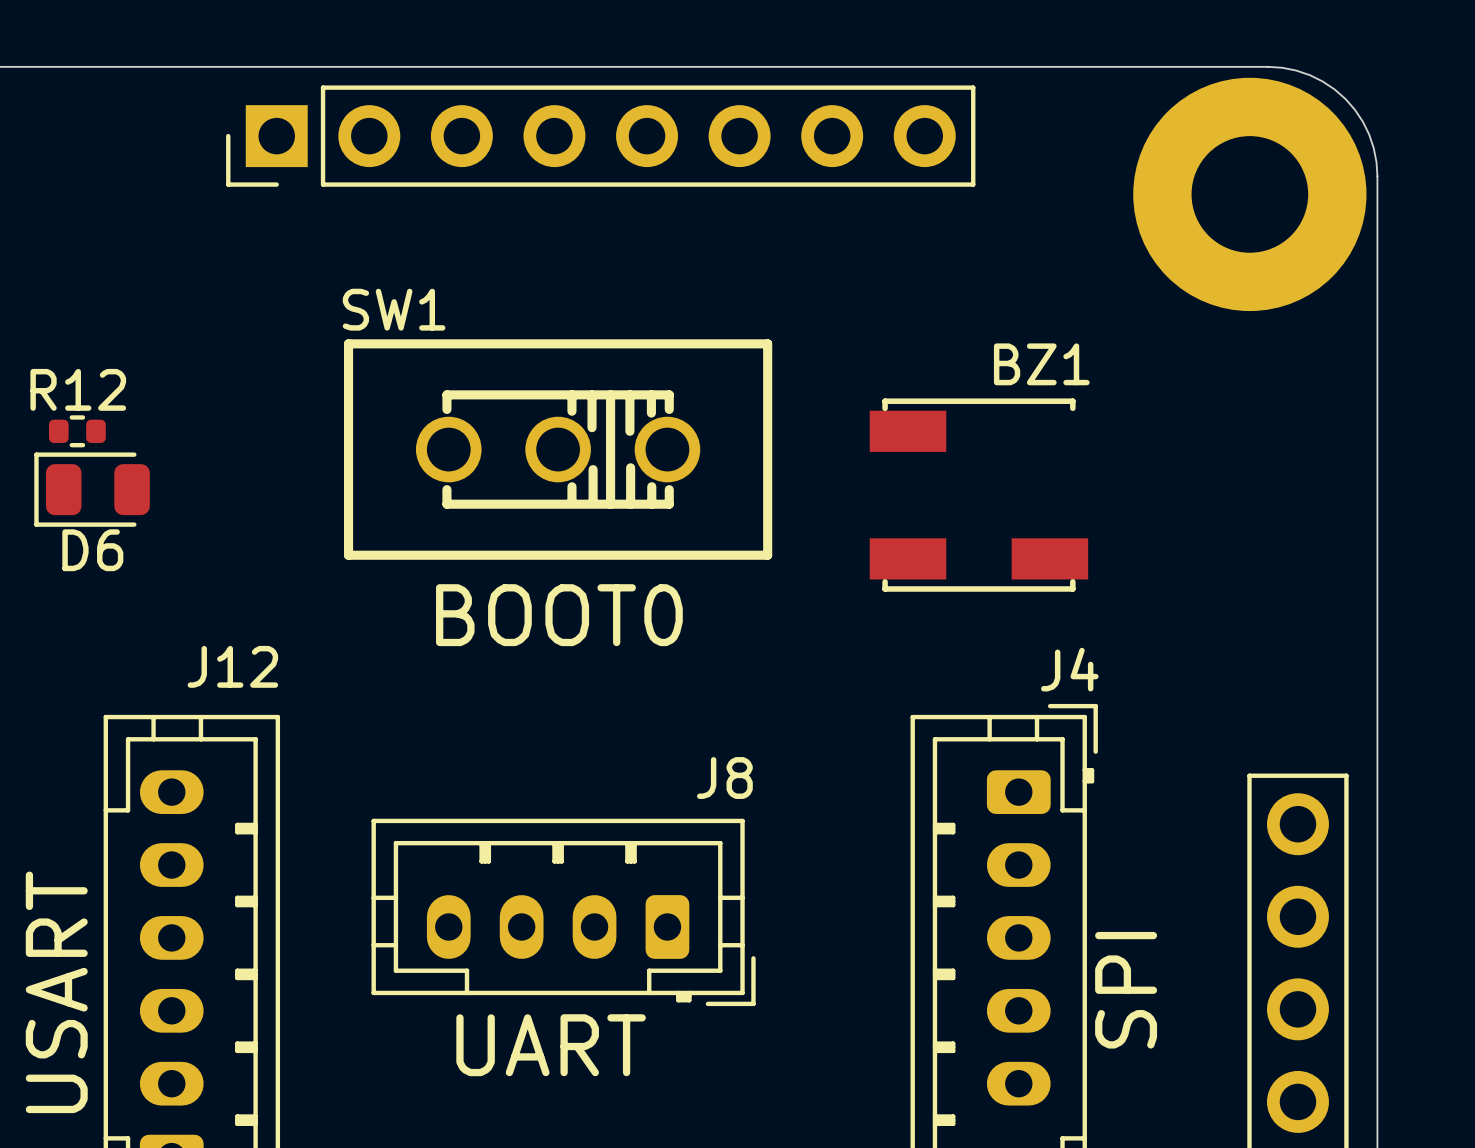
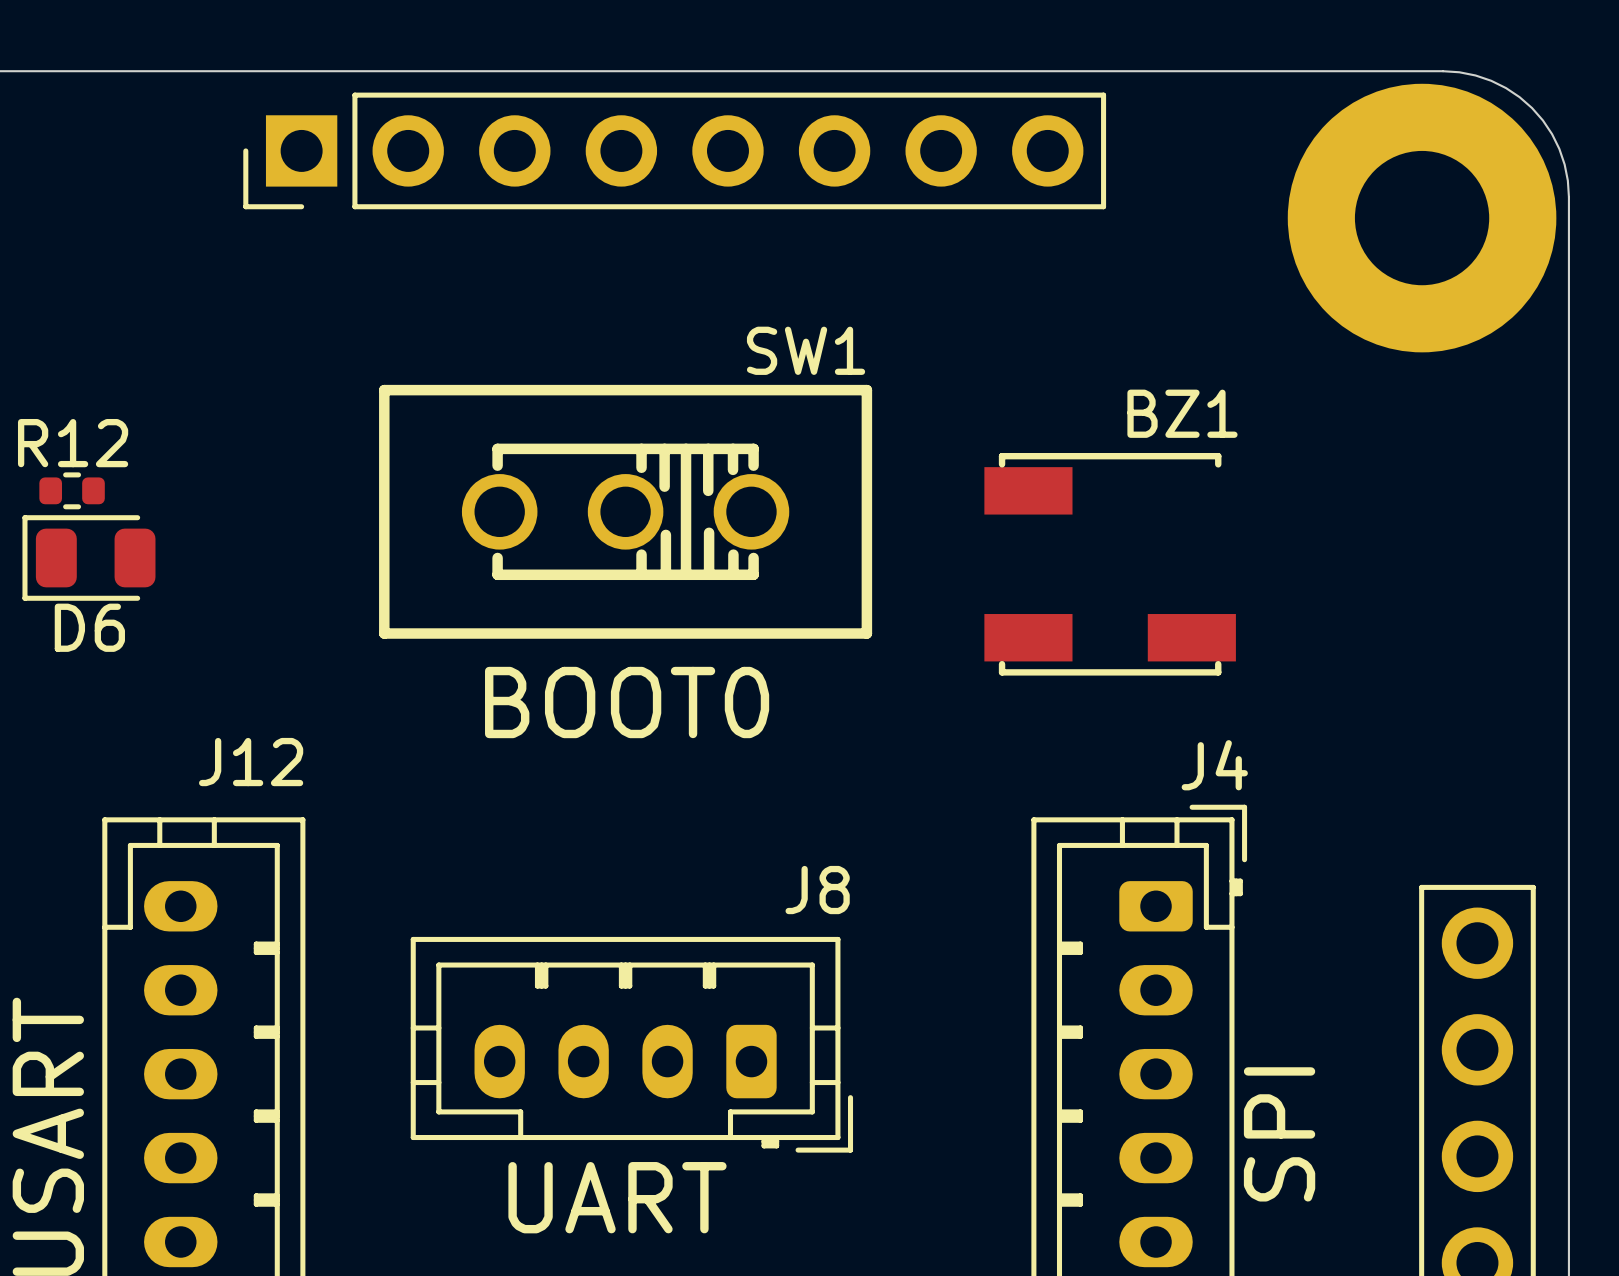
SW1 name position: SW1 (394, 309) -> SW1 (806, 350)

